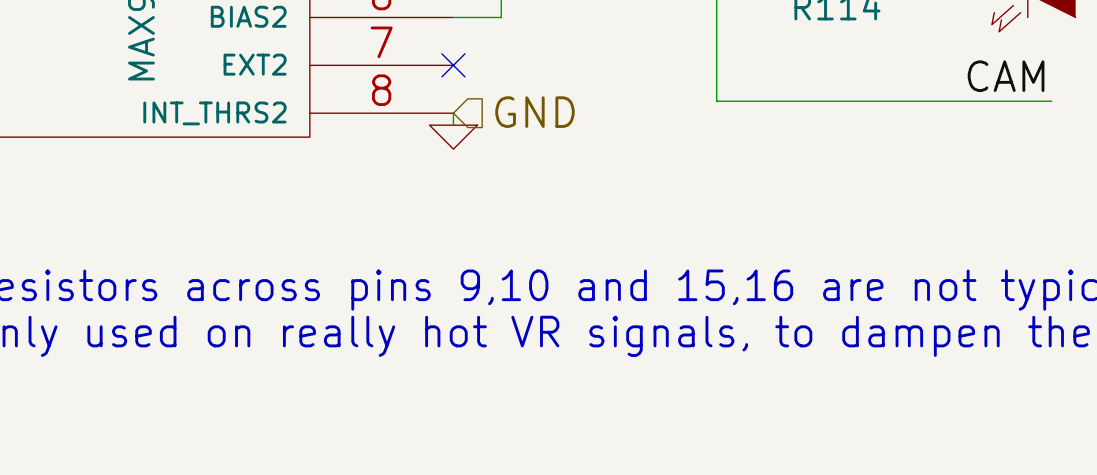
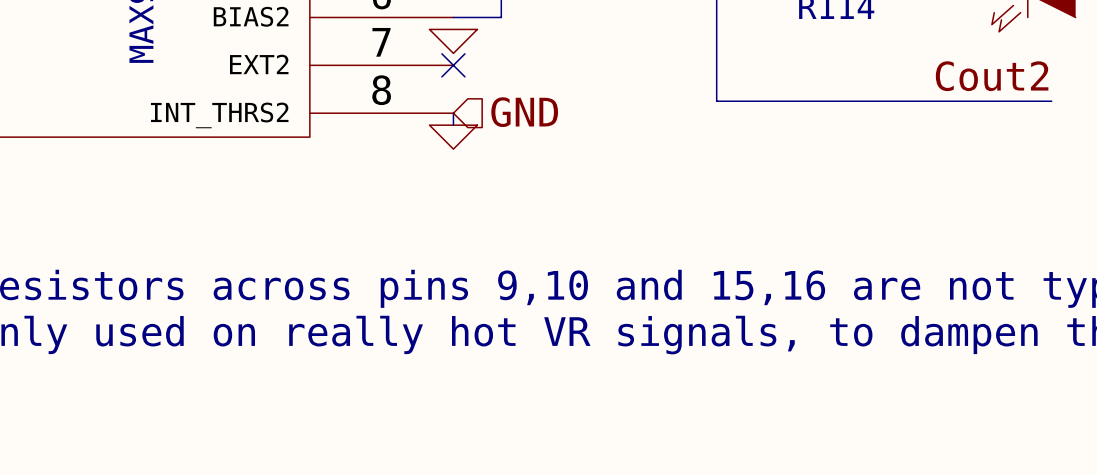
power symbol: none -> (453, 41)
label: CAM (1006, 76) -> Cout2 (992, 76)

